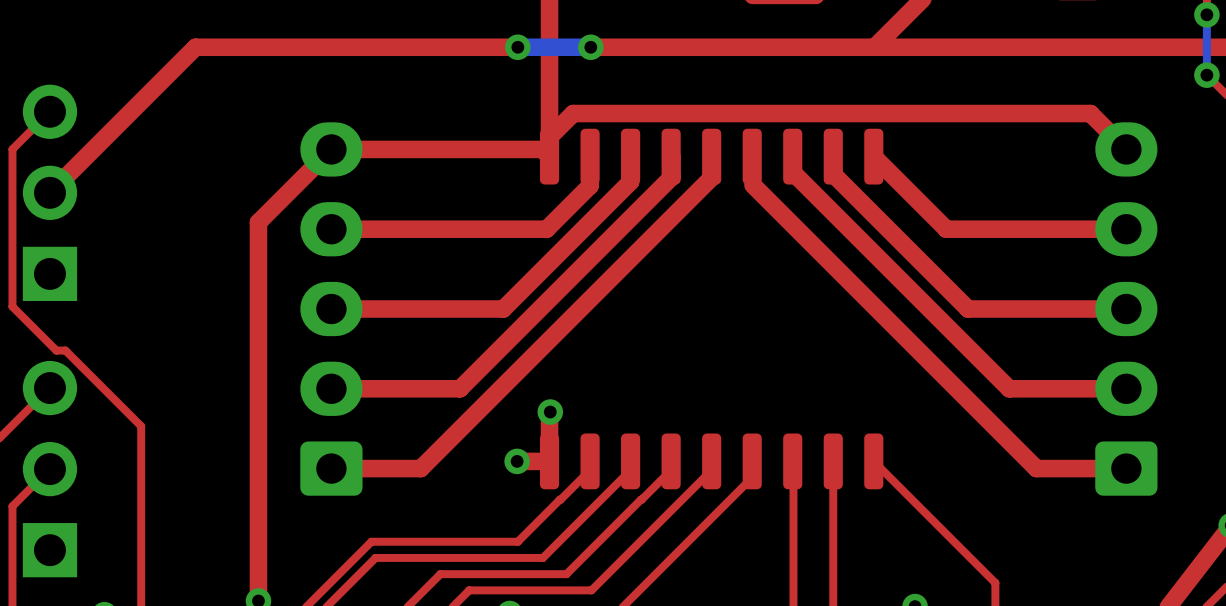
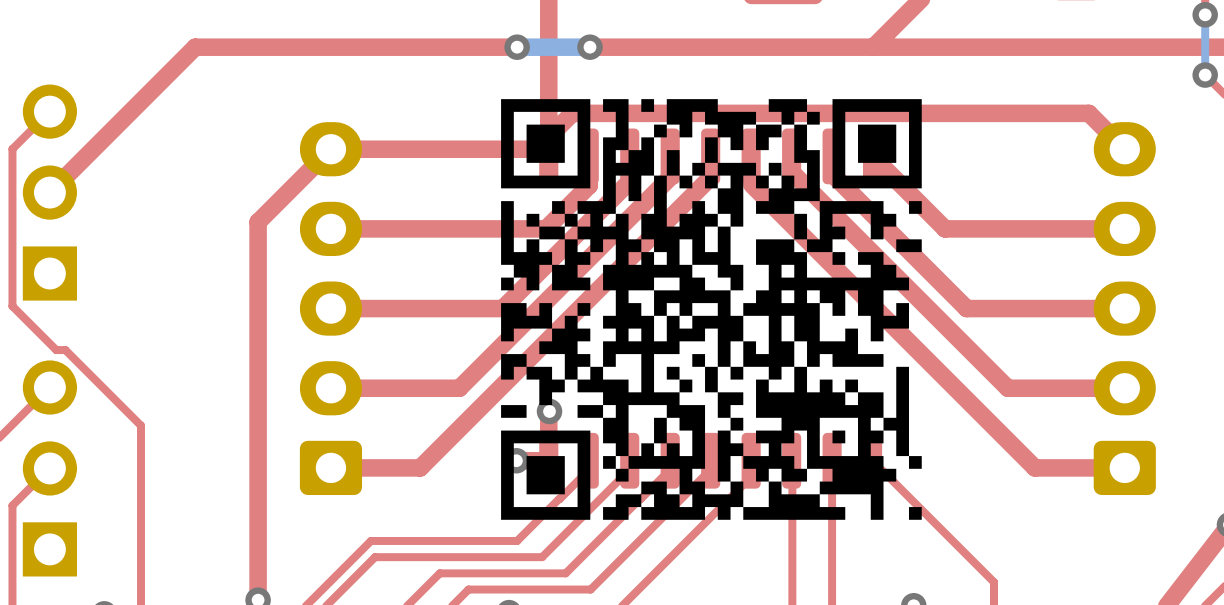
drawing: none -> [501, 99, 922, 520]

